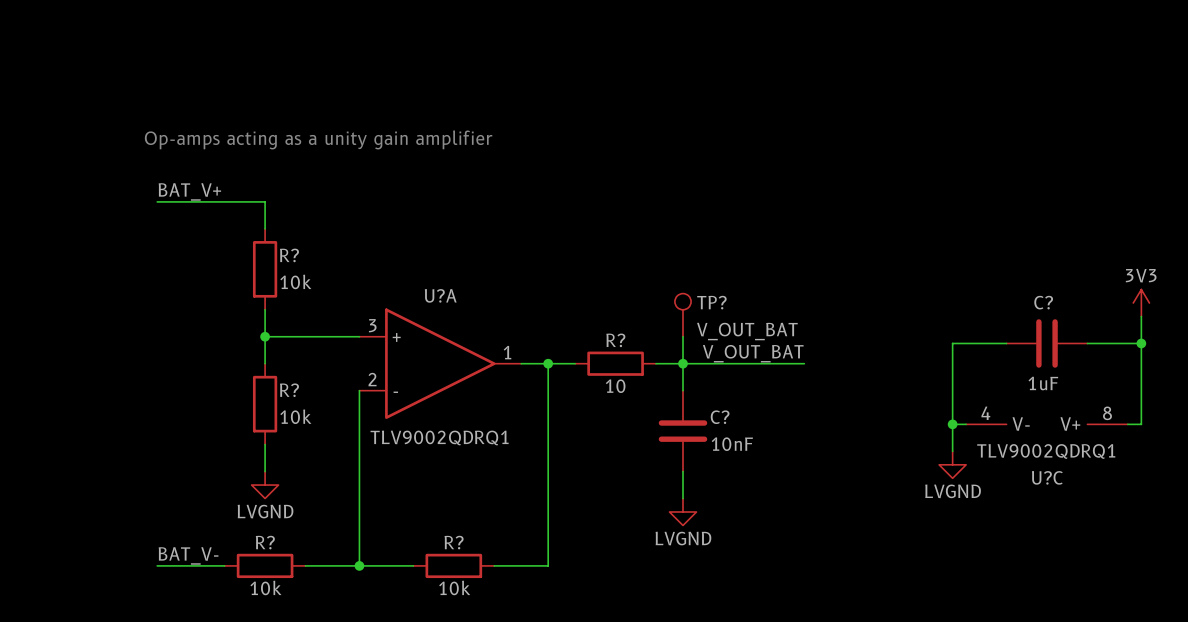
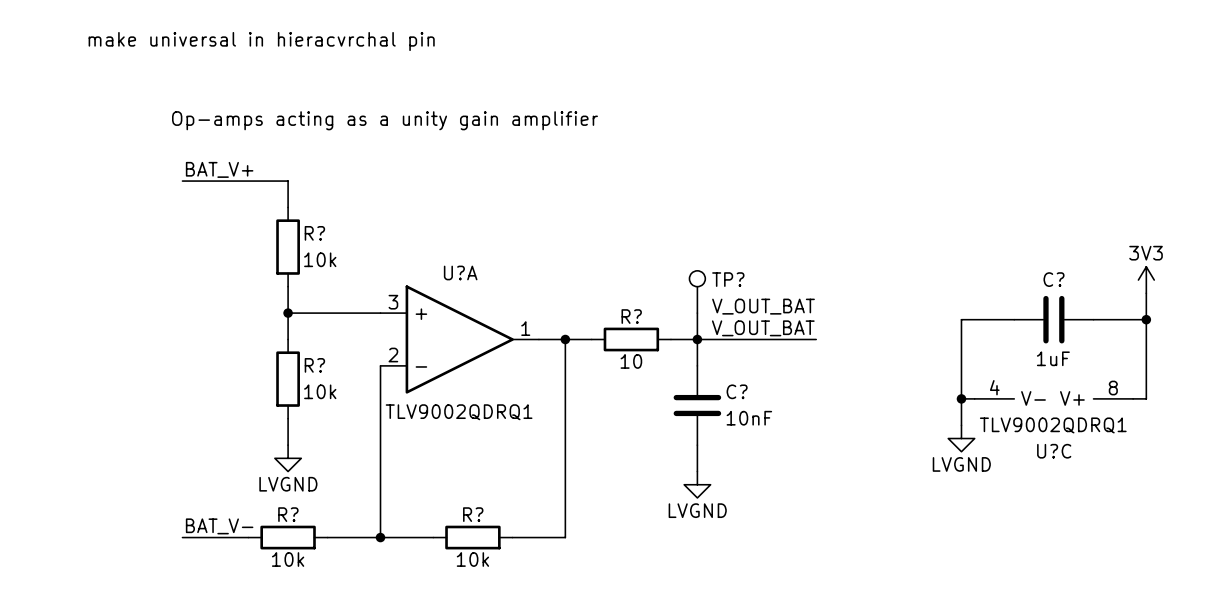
text: none -> make universal in hieracvrchal pin (261, 41)

